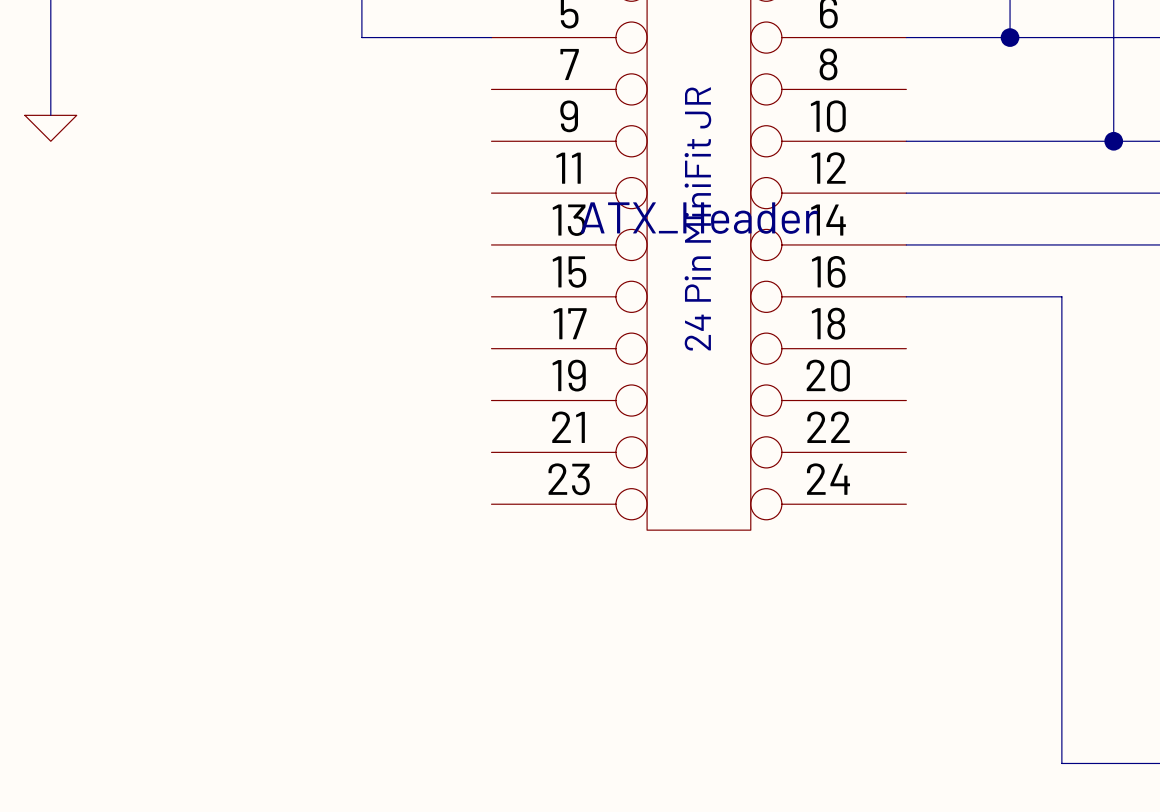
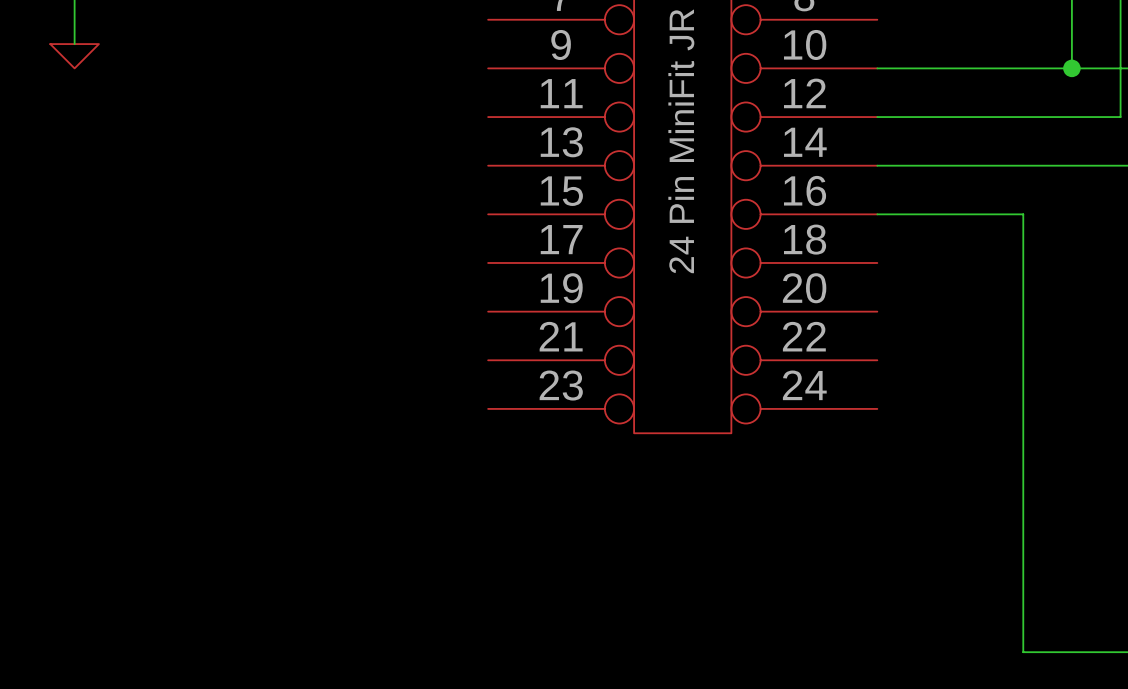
part text: ATX_Header (699, 218) -> none

